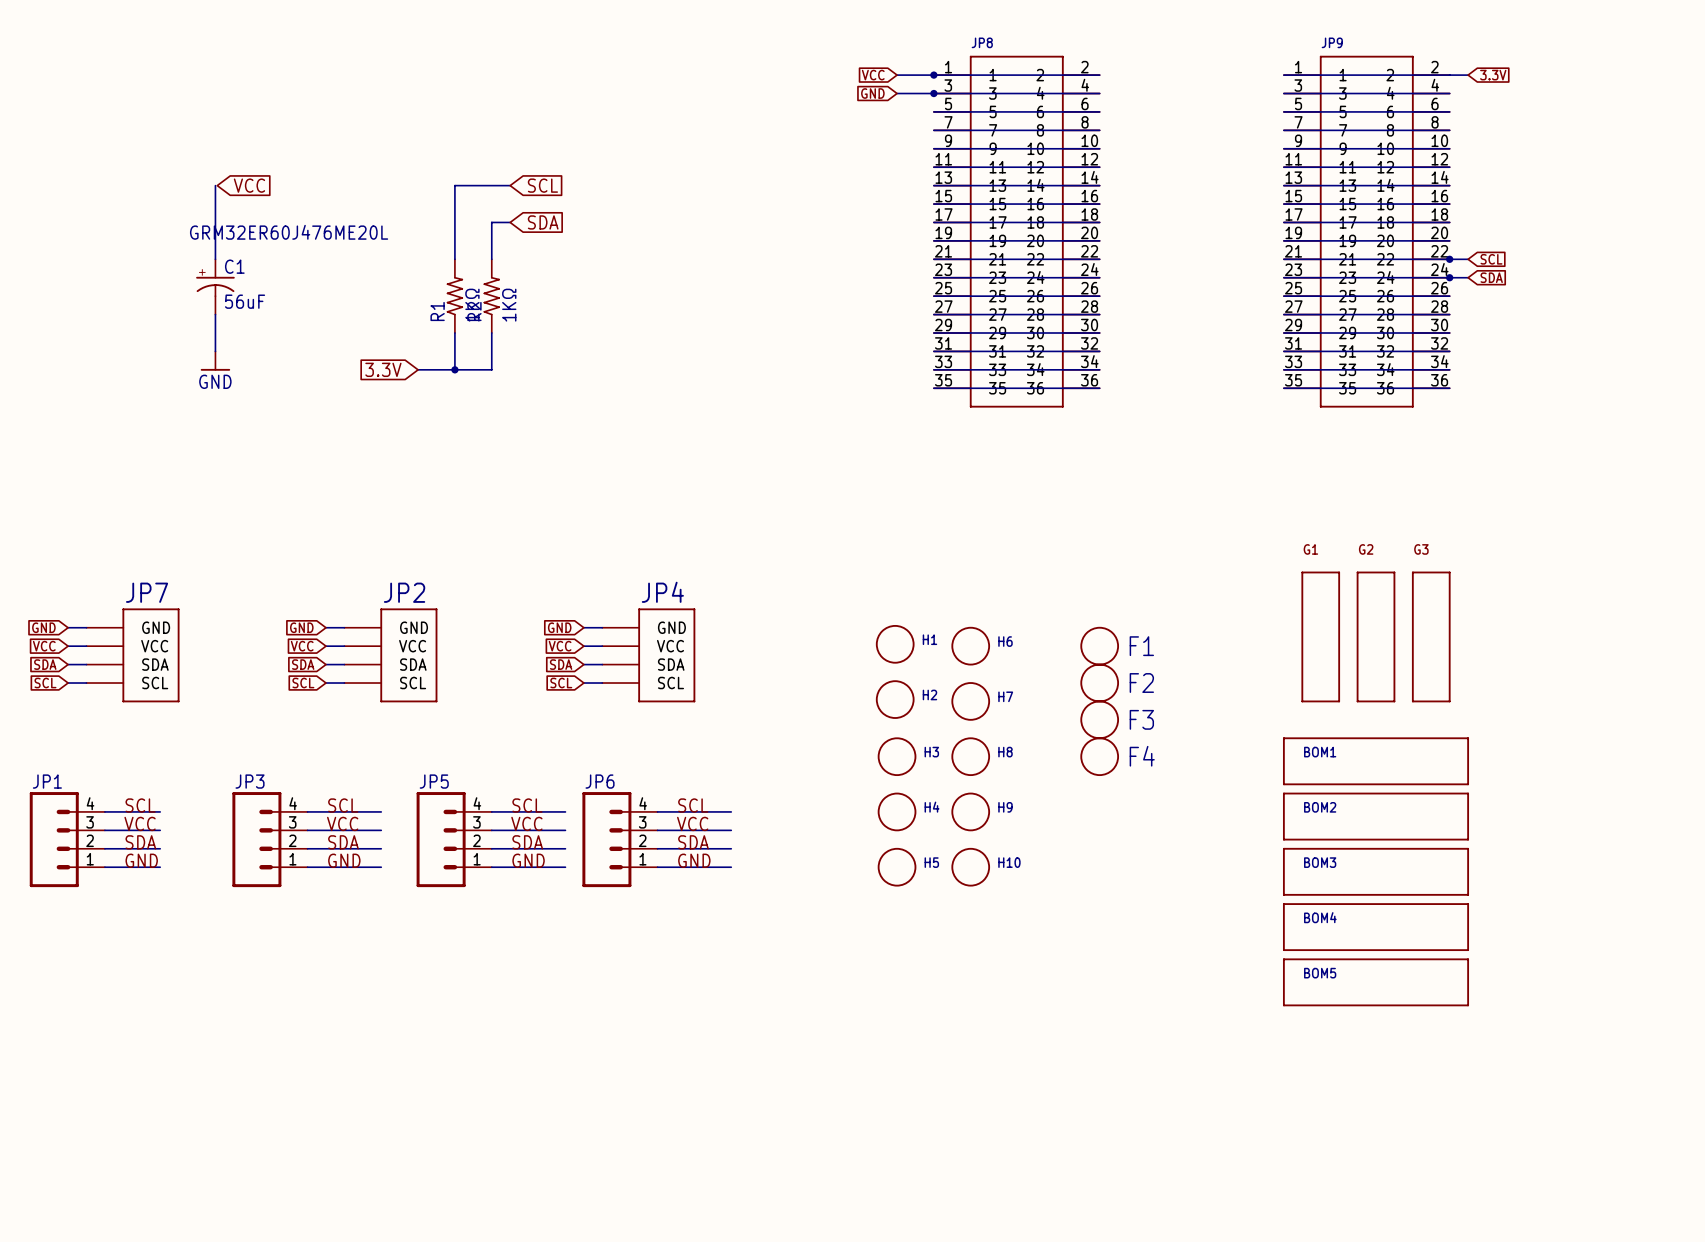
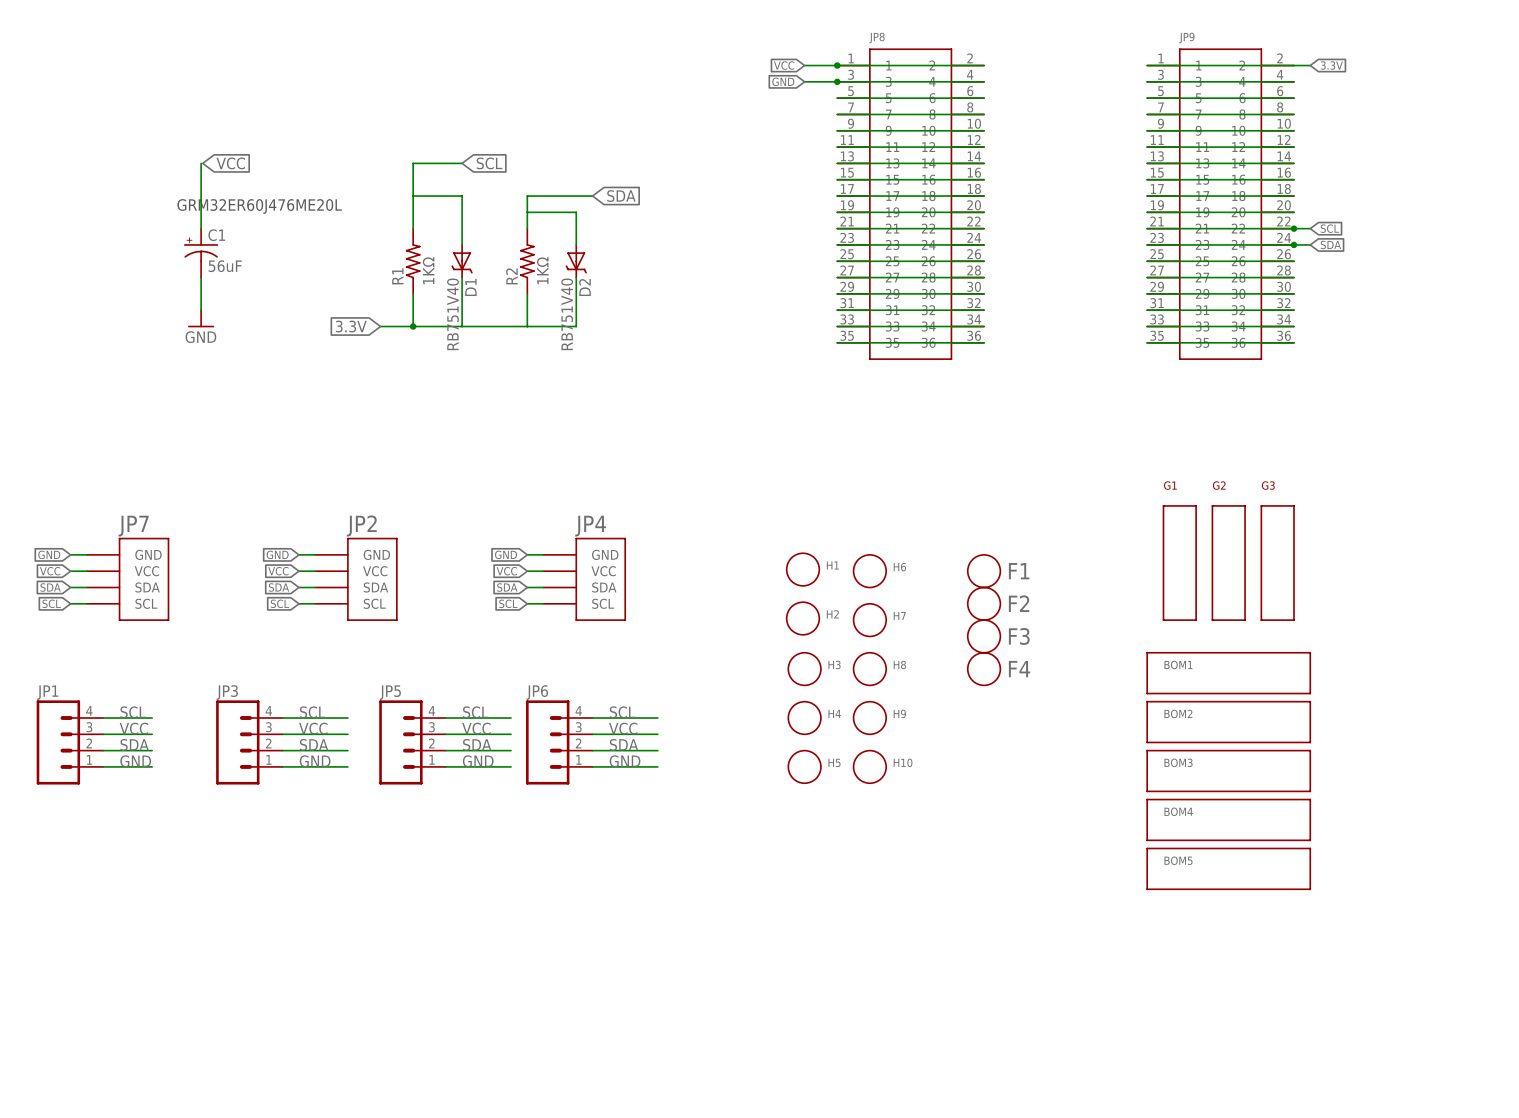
wire: (491, 222) (491, 259) -> (445, 196) (413, 196)
wire: none -> (462, 196) (462, 244)
global label position: SDA (543, 222) -> SDA (621, 196)
wire: none -> (592, 196) (527, 196) (527, 228)
wire: none -> (527, 212) (576, 212) (576, 244)
R2 position: (491, 296) -> (527, 261)
D1: none -> RB751V40 (462, 261)
D2: none -> RB751V40 (576, 261)
wire: none -> (462, 277) (462, 326)
wire: (491, 332) (491, 369) -> (576, 277) (576, 326) (445, 326)
wire: none -> (527, 293) (527, 326)

